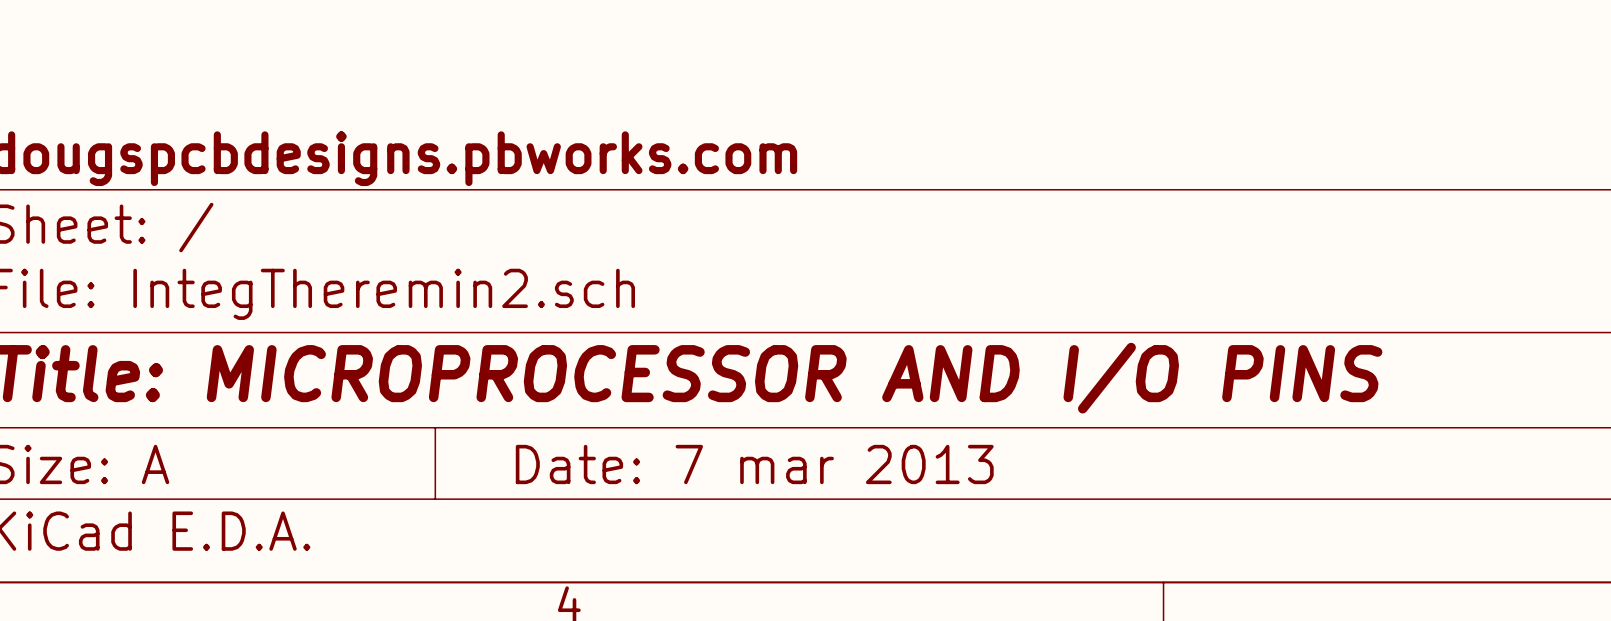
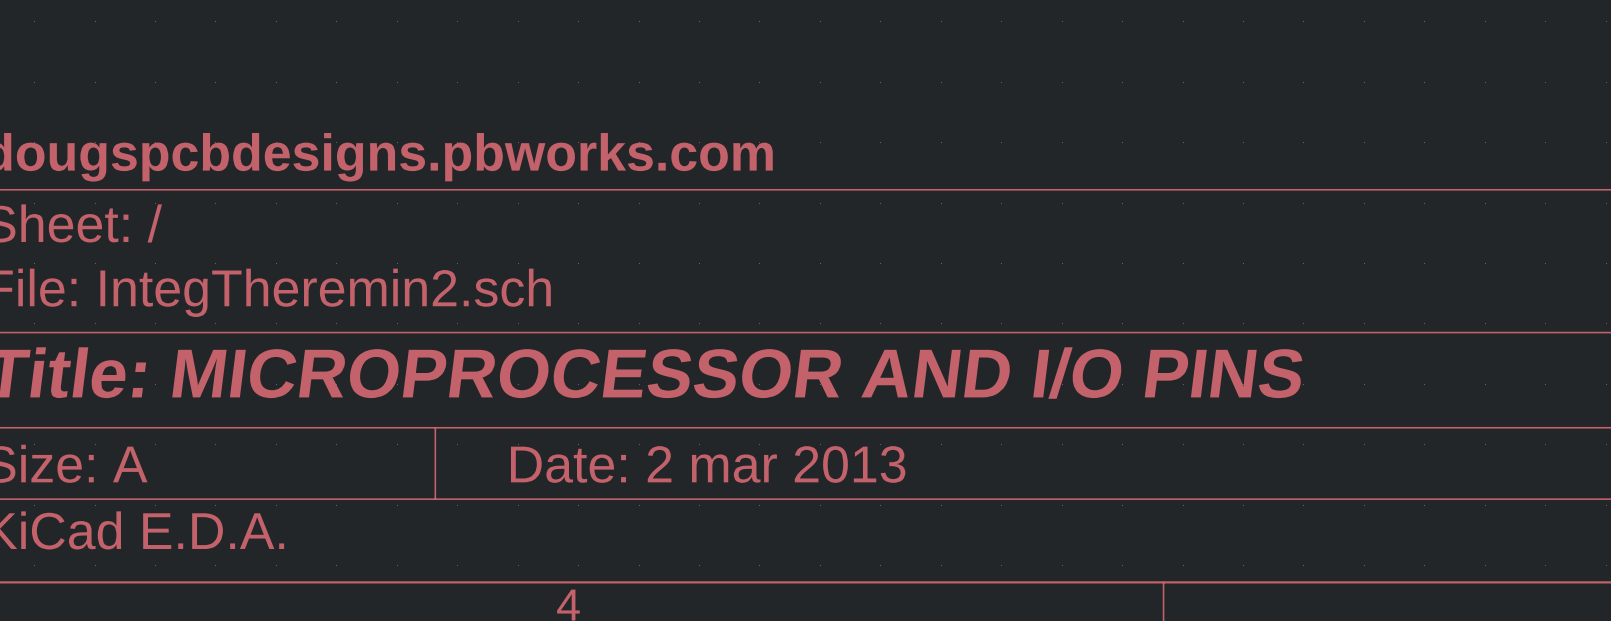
title block: Date: 7 mar 2013 (754, 464) -> Date: 2 mar 2013 (708, 464)

